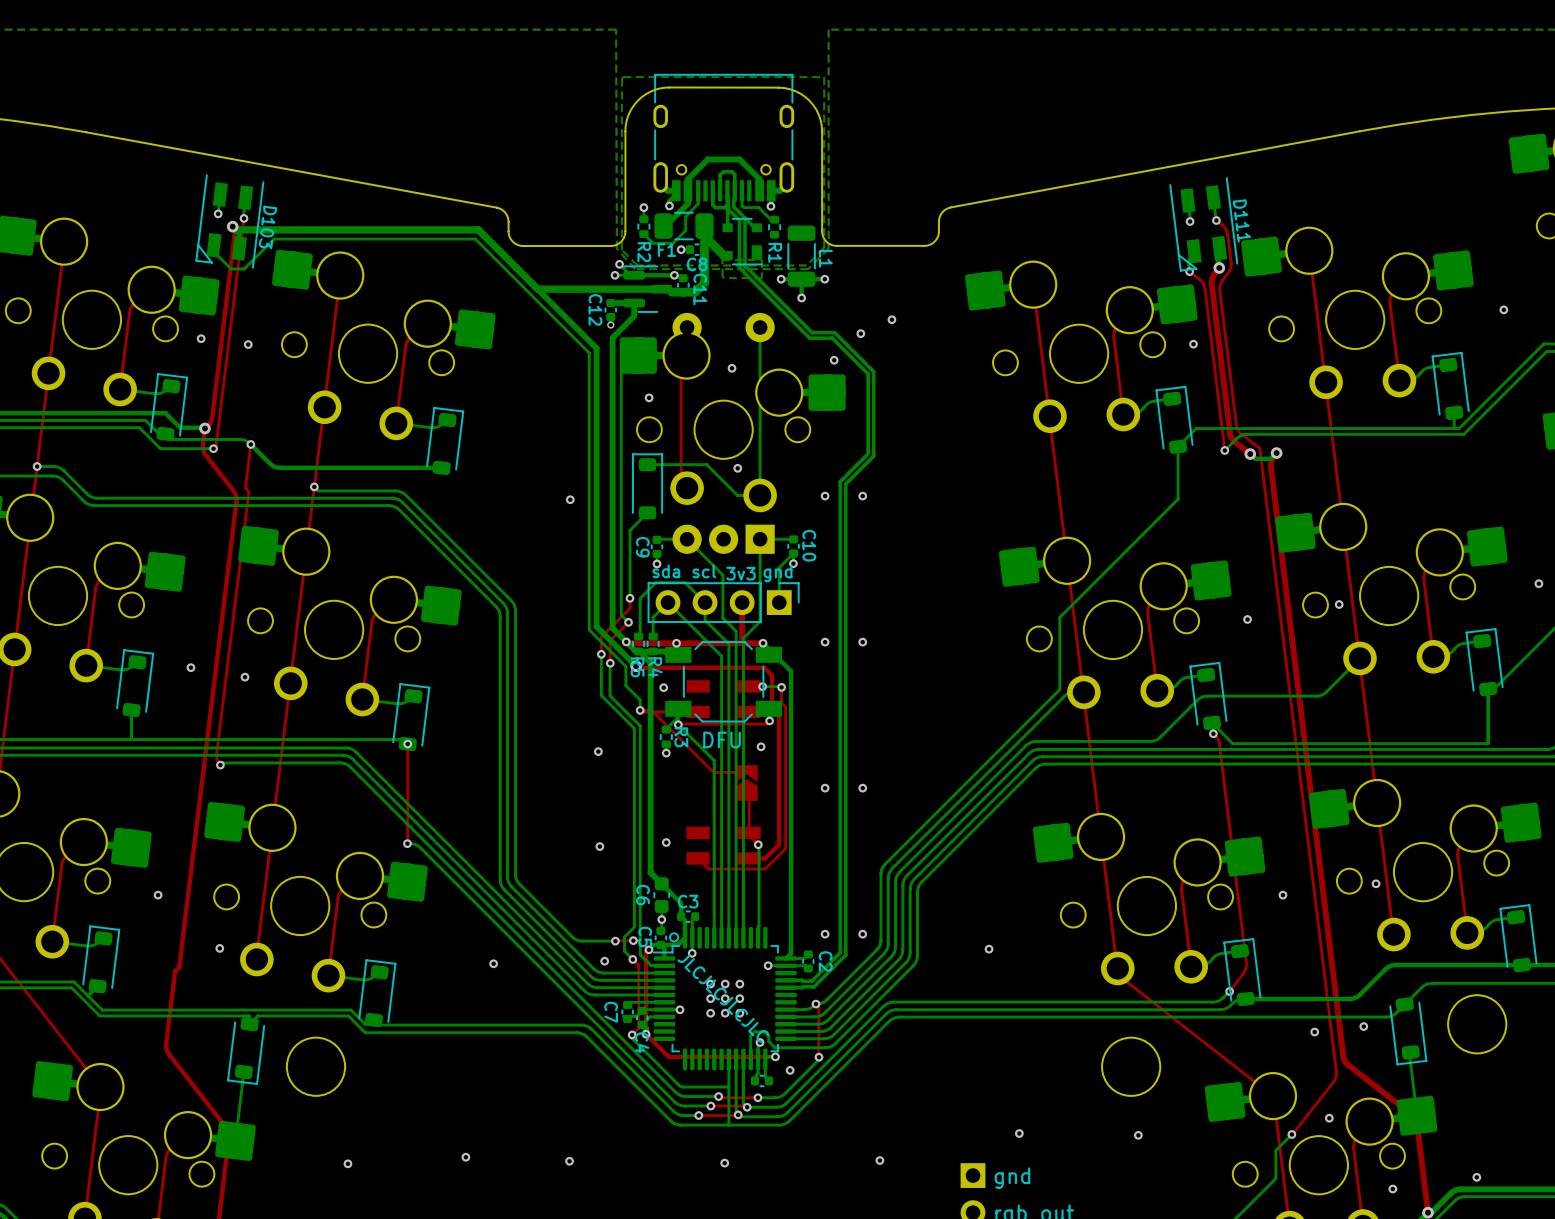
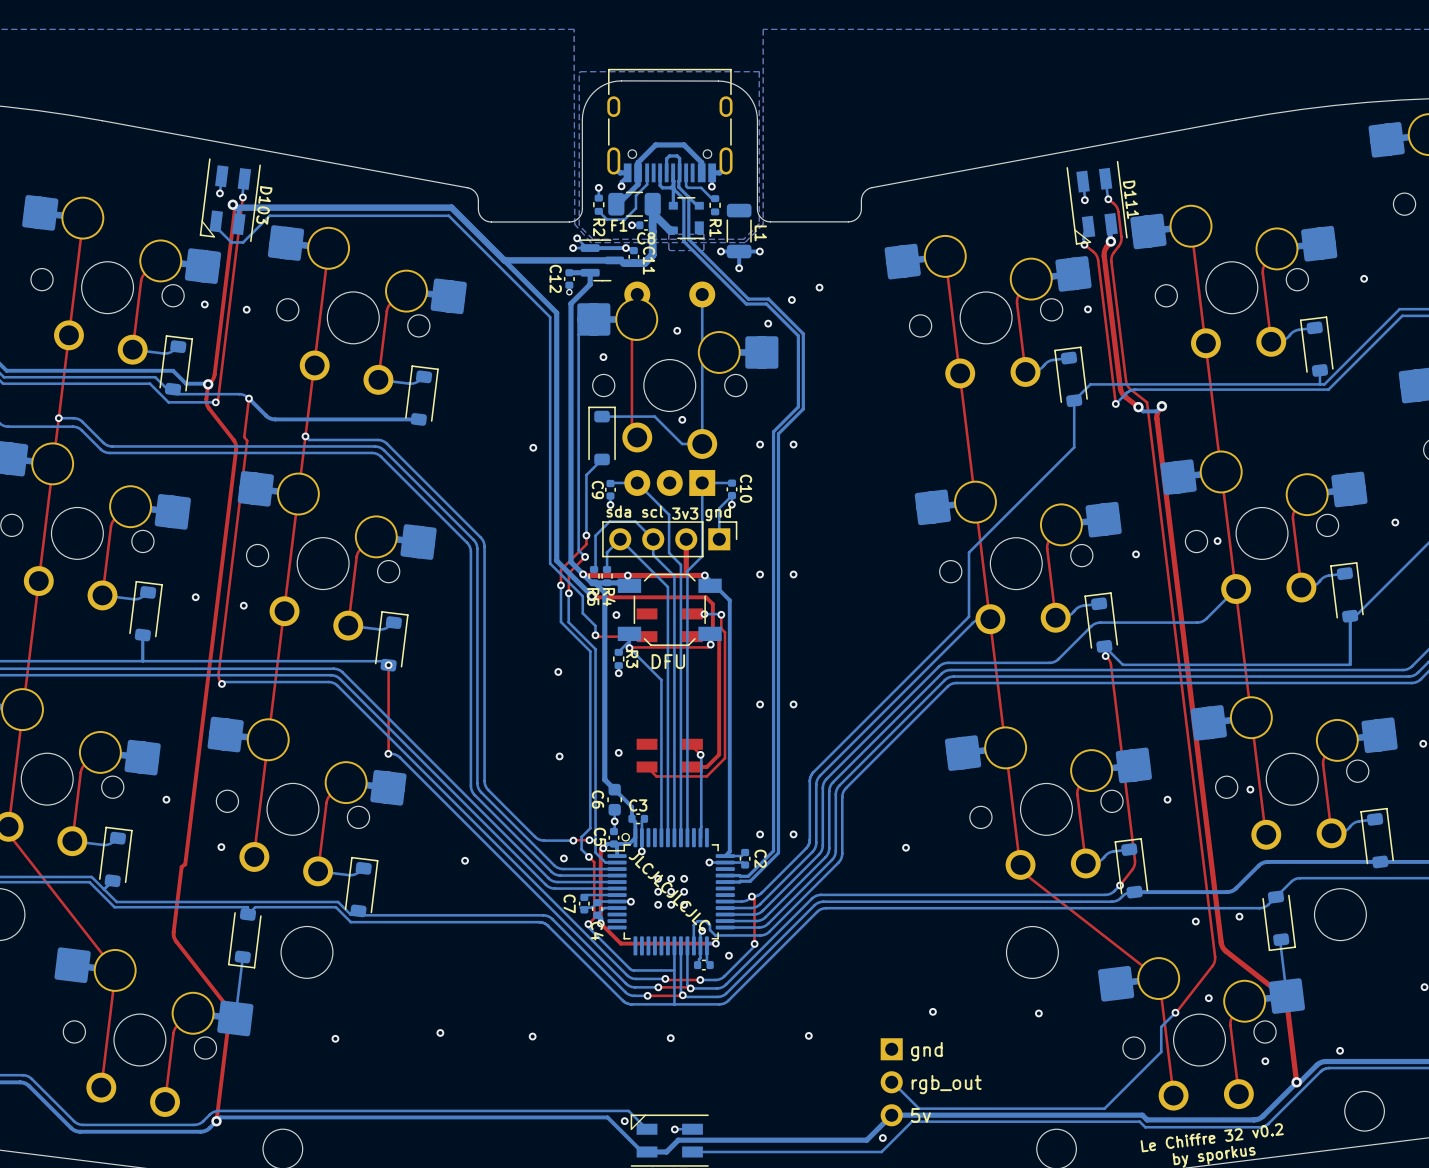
top track: (640, 710) (651, 710) (713, 772) (746, 772) -> none
via: (761, 746) -> none
part: (746, 783) -> none
top track: (746, 793) (749, 796) (749, 832) -> none

